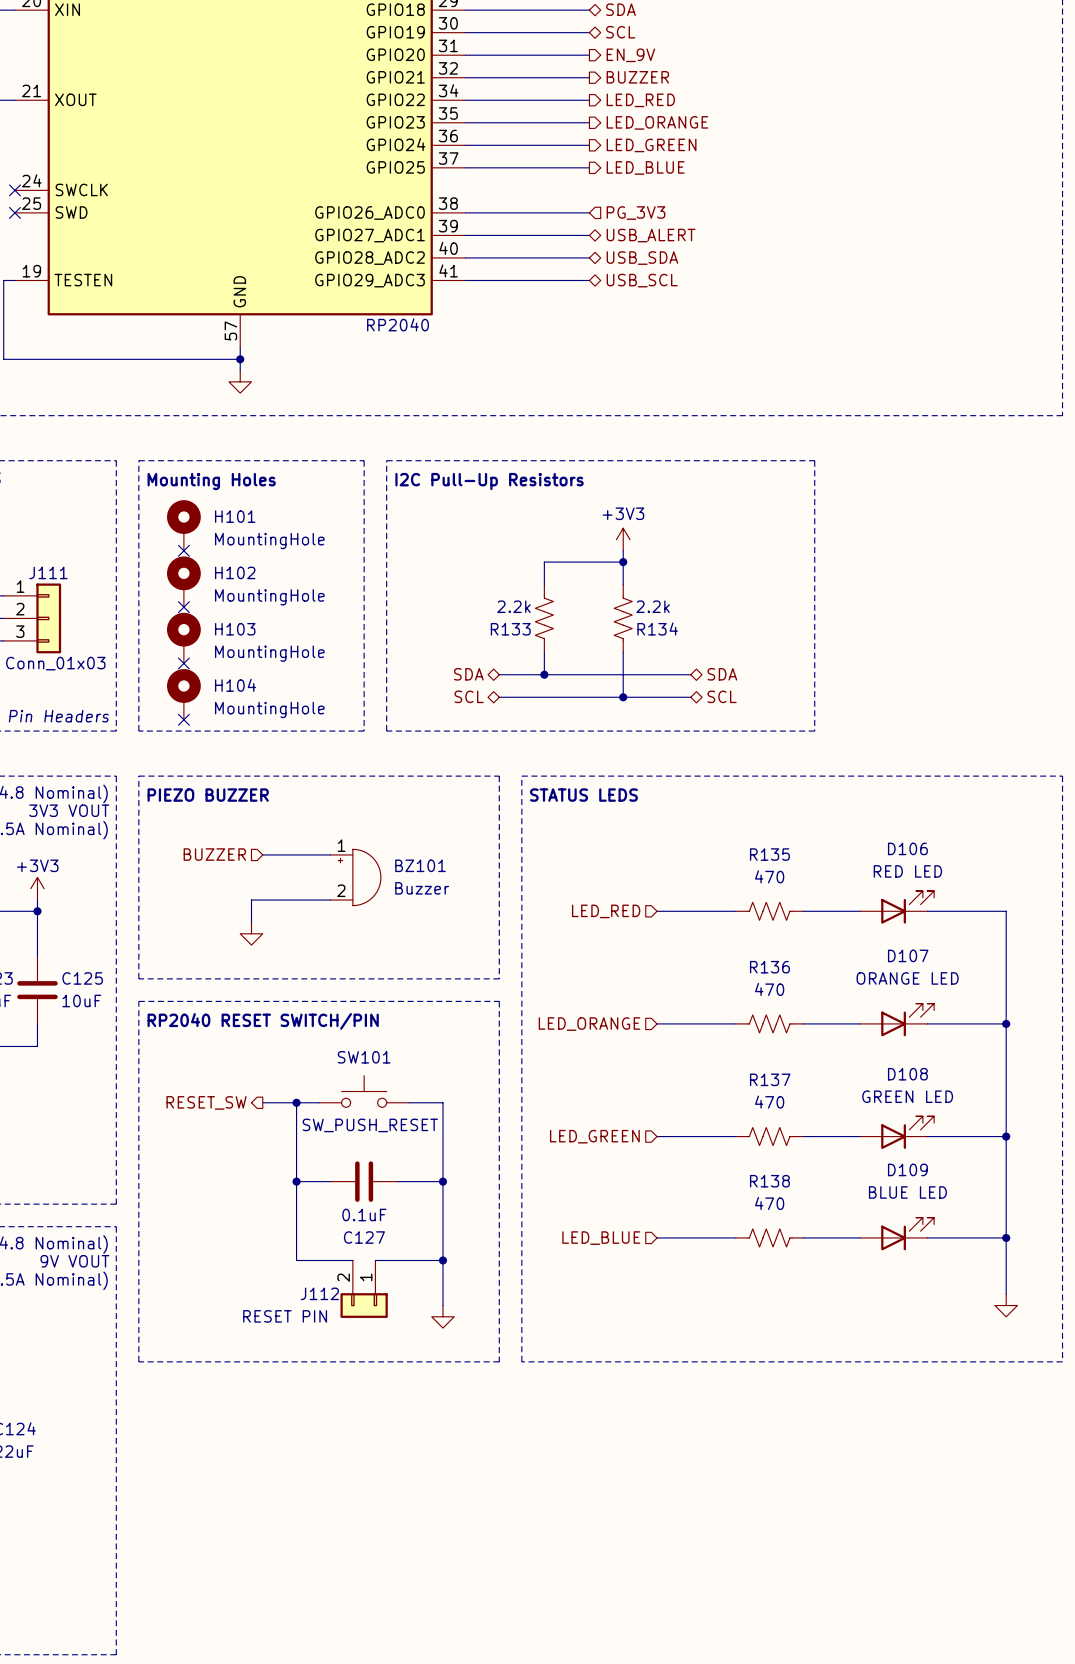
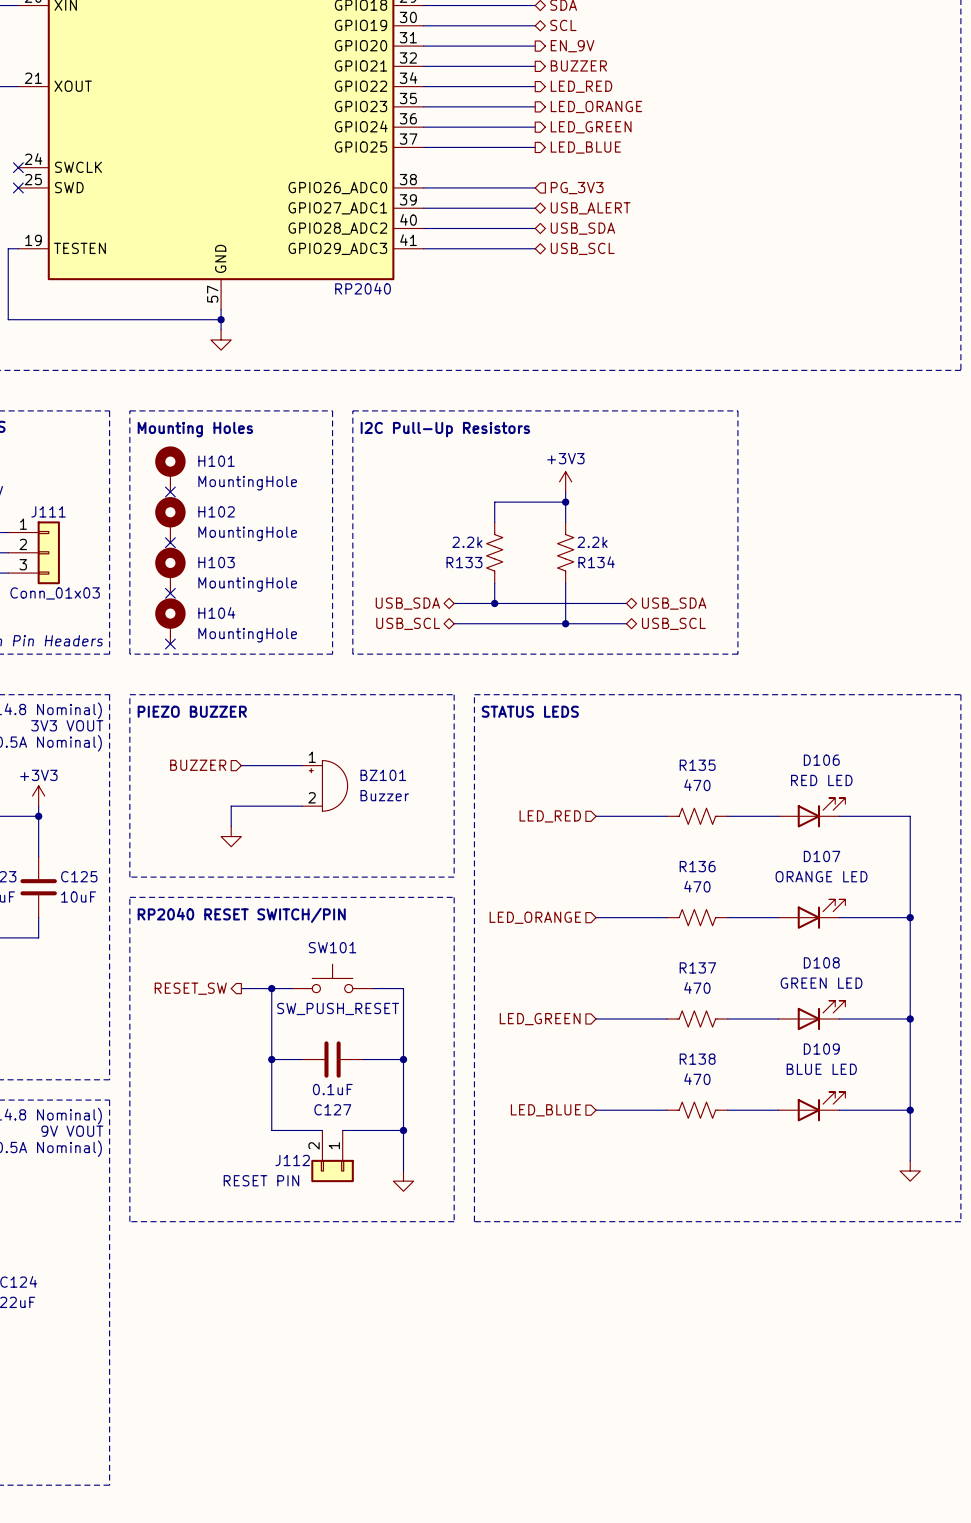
hierarchical label: SDA (468, 674) -> USB_SDA (407, 603)
hierarchical label: SDA (722, 674) -> USB_SDA (674, 603)
hierarchical label: SCL (469, 696) -> USB_SCL (408, 623)
hierarchical label: SCL (722, 696) -> USB_SCL (673, 623)

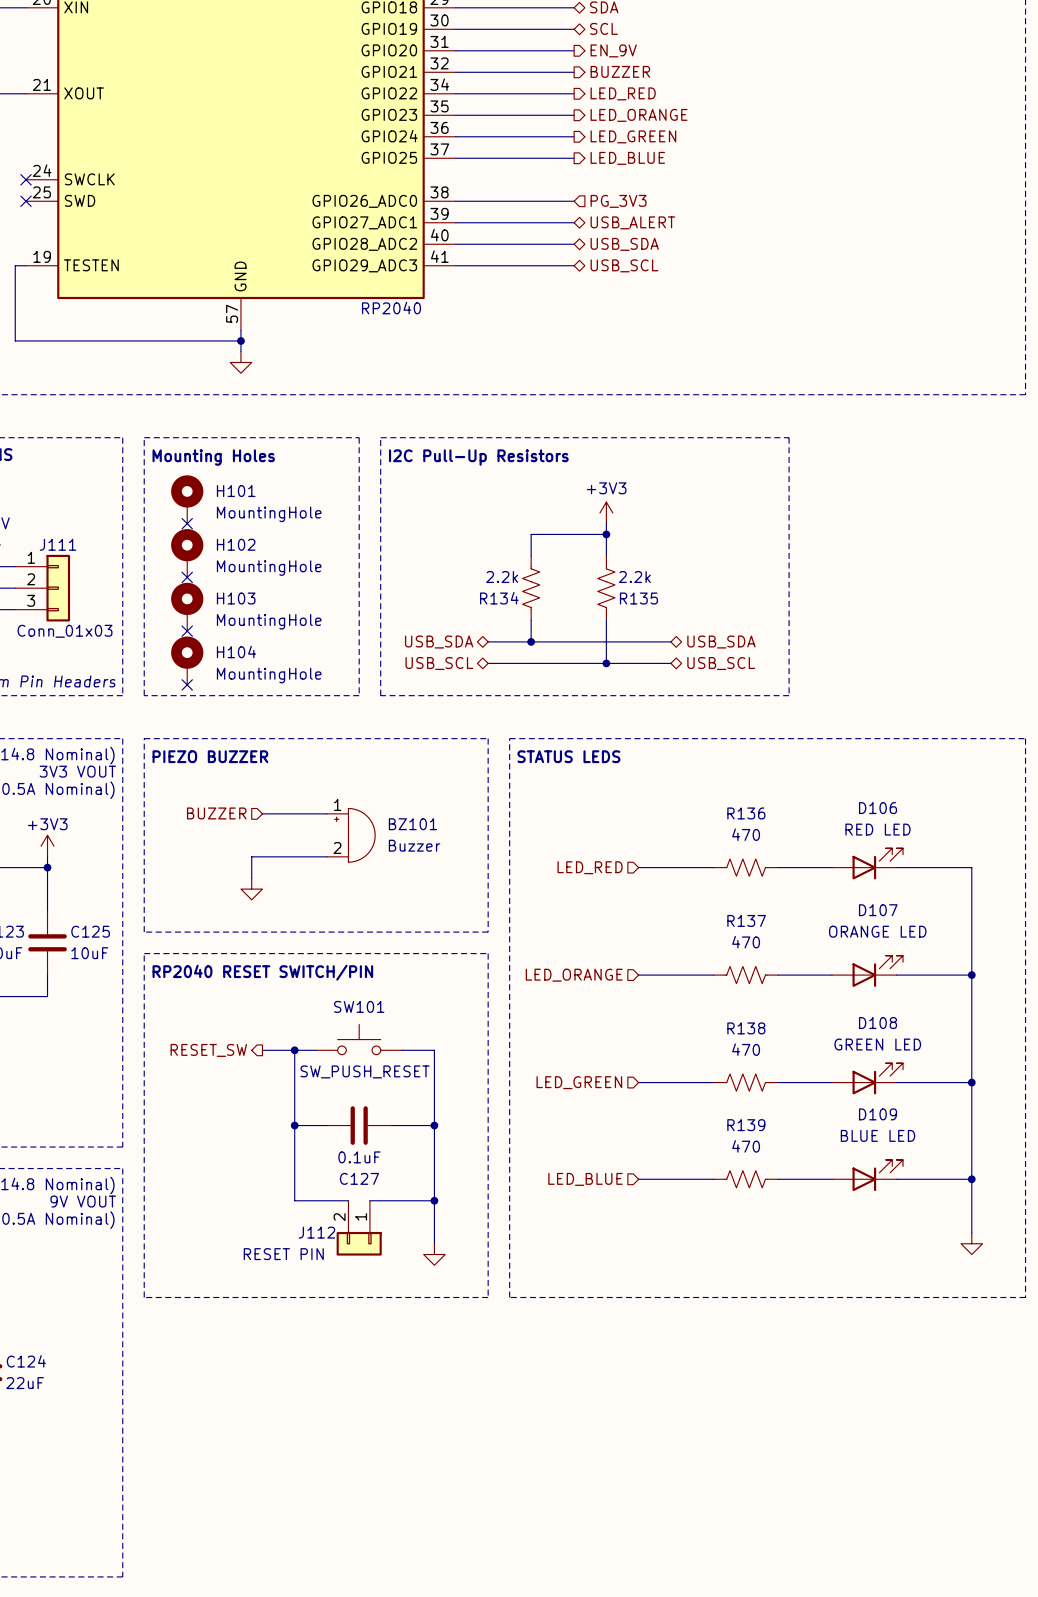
R133 name: R133 (464, 562) -> R134 (499, 598)
R134 name: R134 (596, 562) -> R135 (638, 598)
R135 name: R135 (697, 765) -> R136 (746, 813)
R136 name: R136 (697, 866) -> R137 (746, 920)
R137 name: R137 (697, 967) -> R138 (746, 1028)
R138 name: R138 (697, 1059) -> R139 (746, 1125)

